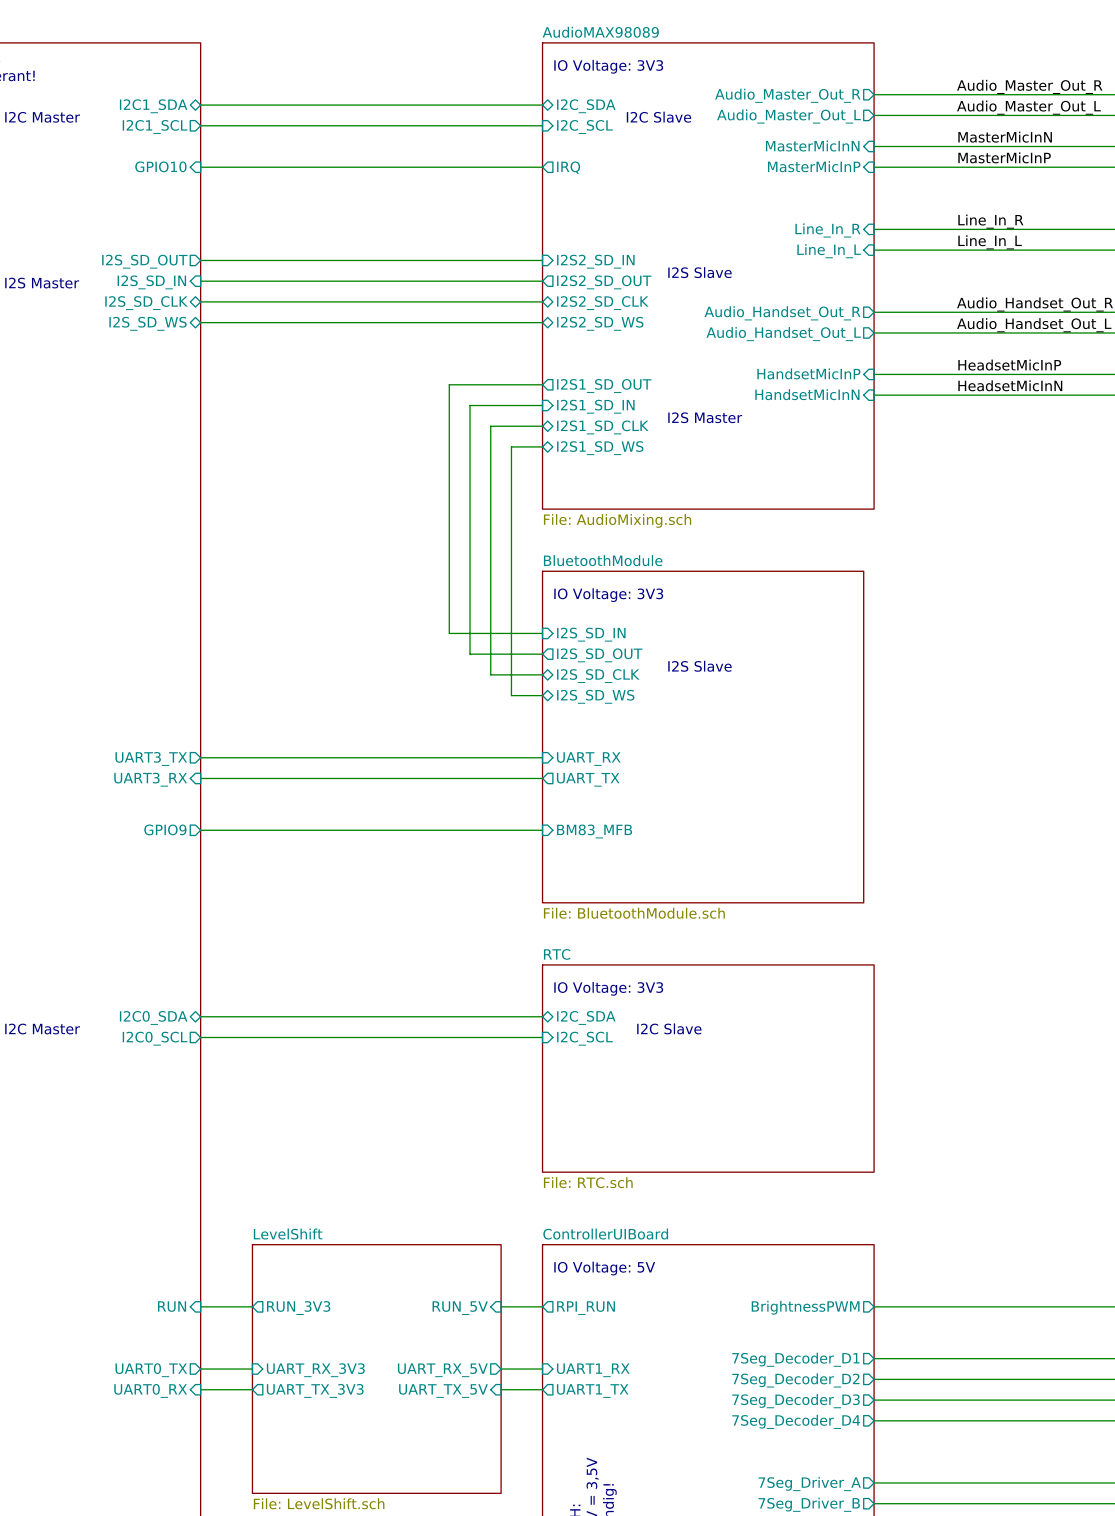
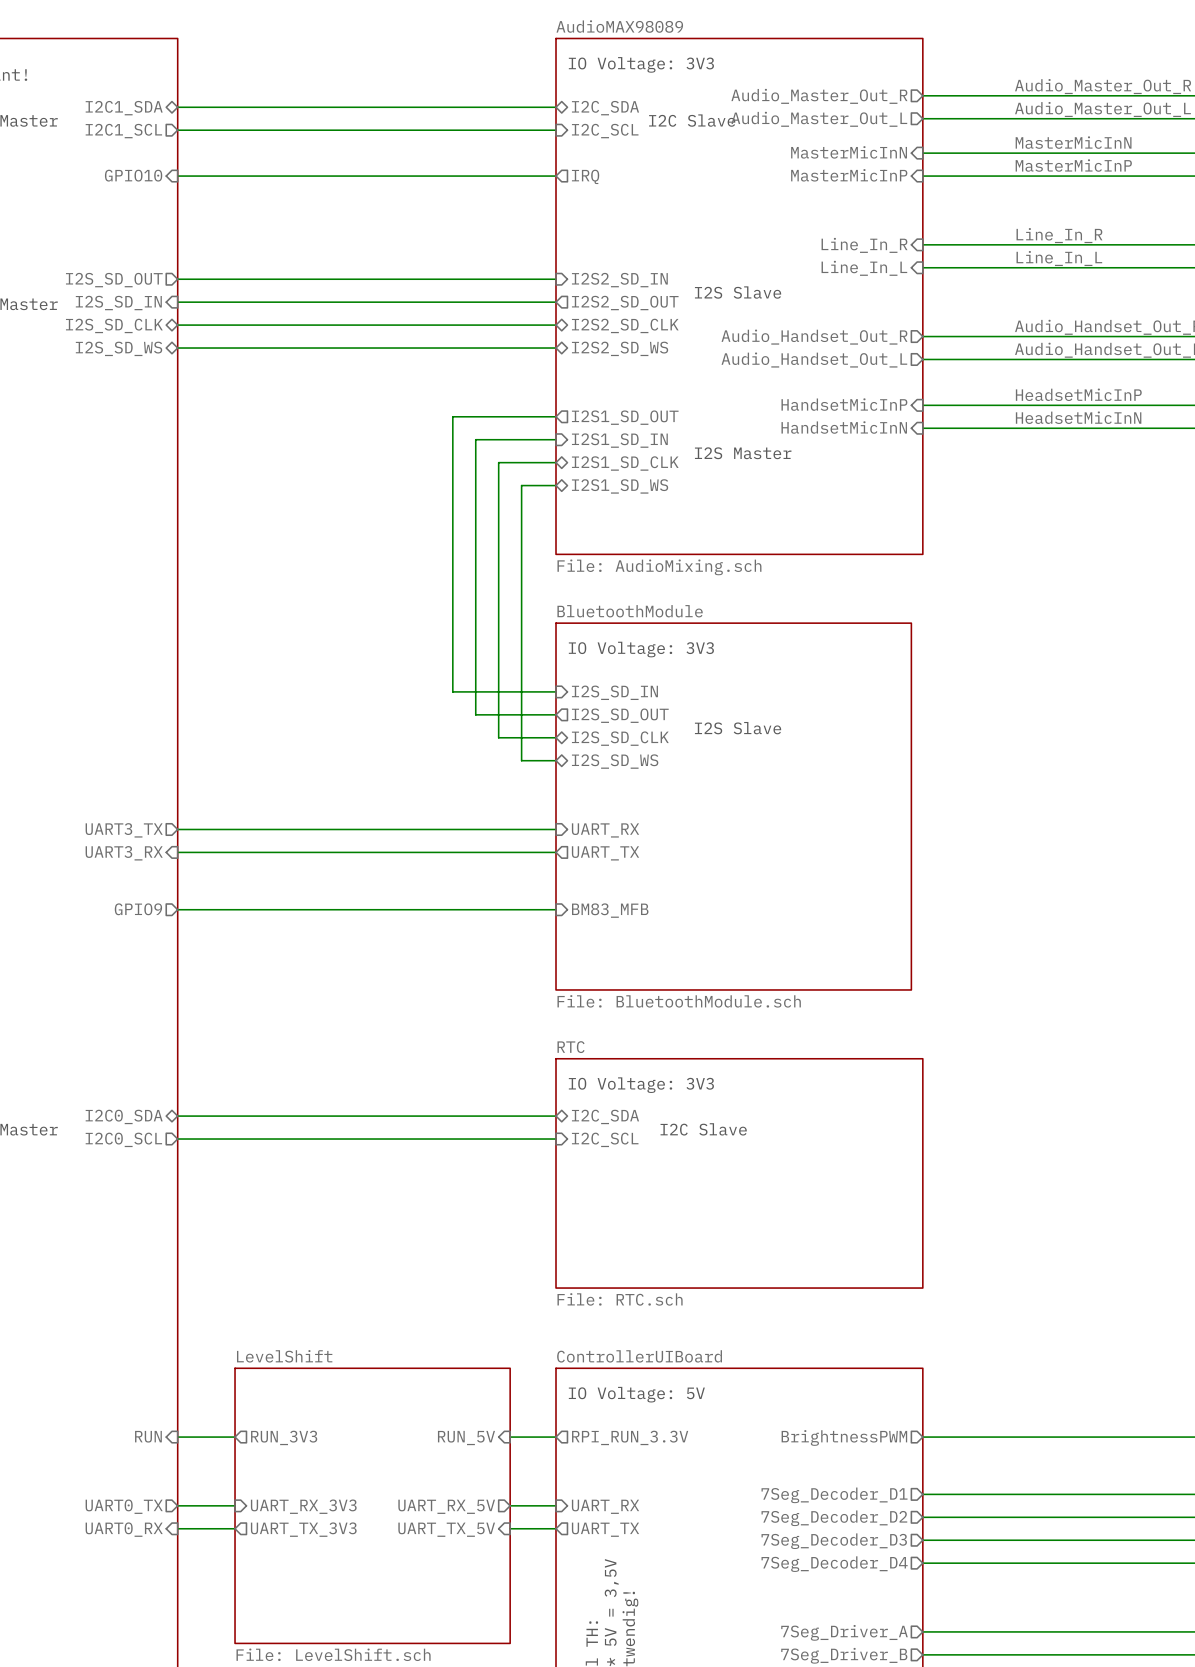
sheet pin: RPI_RUN (586, 1308) -> RPI_RUN_3.3V (630, 1437)
sheet pin: UART1_RX (593, 1370) -> UART_RX (605, 1506)
sheet pin: UART1_TX (592, 1391) -> UART_TX (605, 1529)

